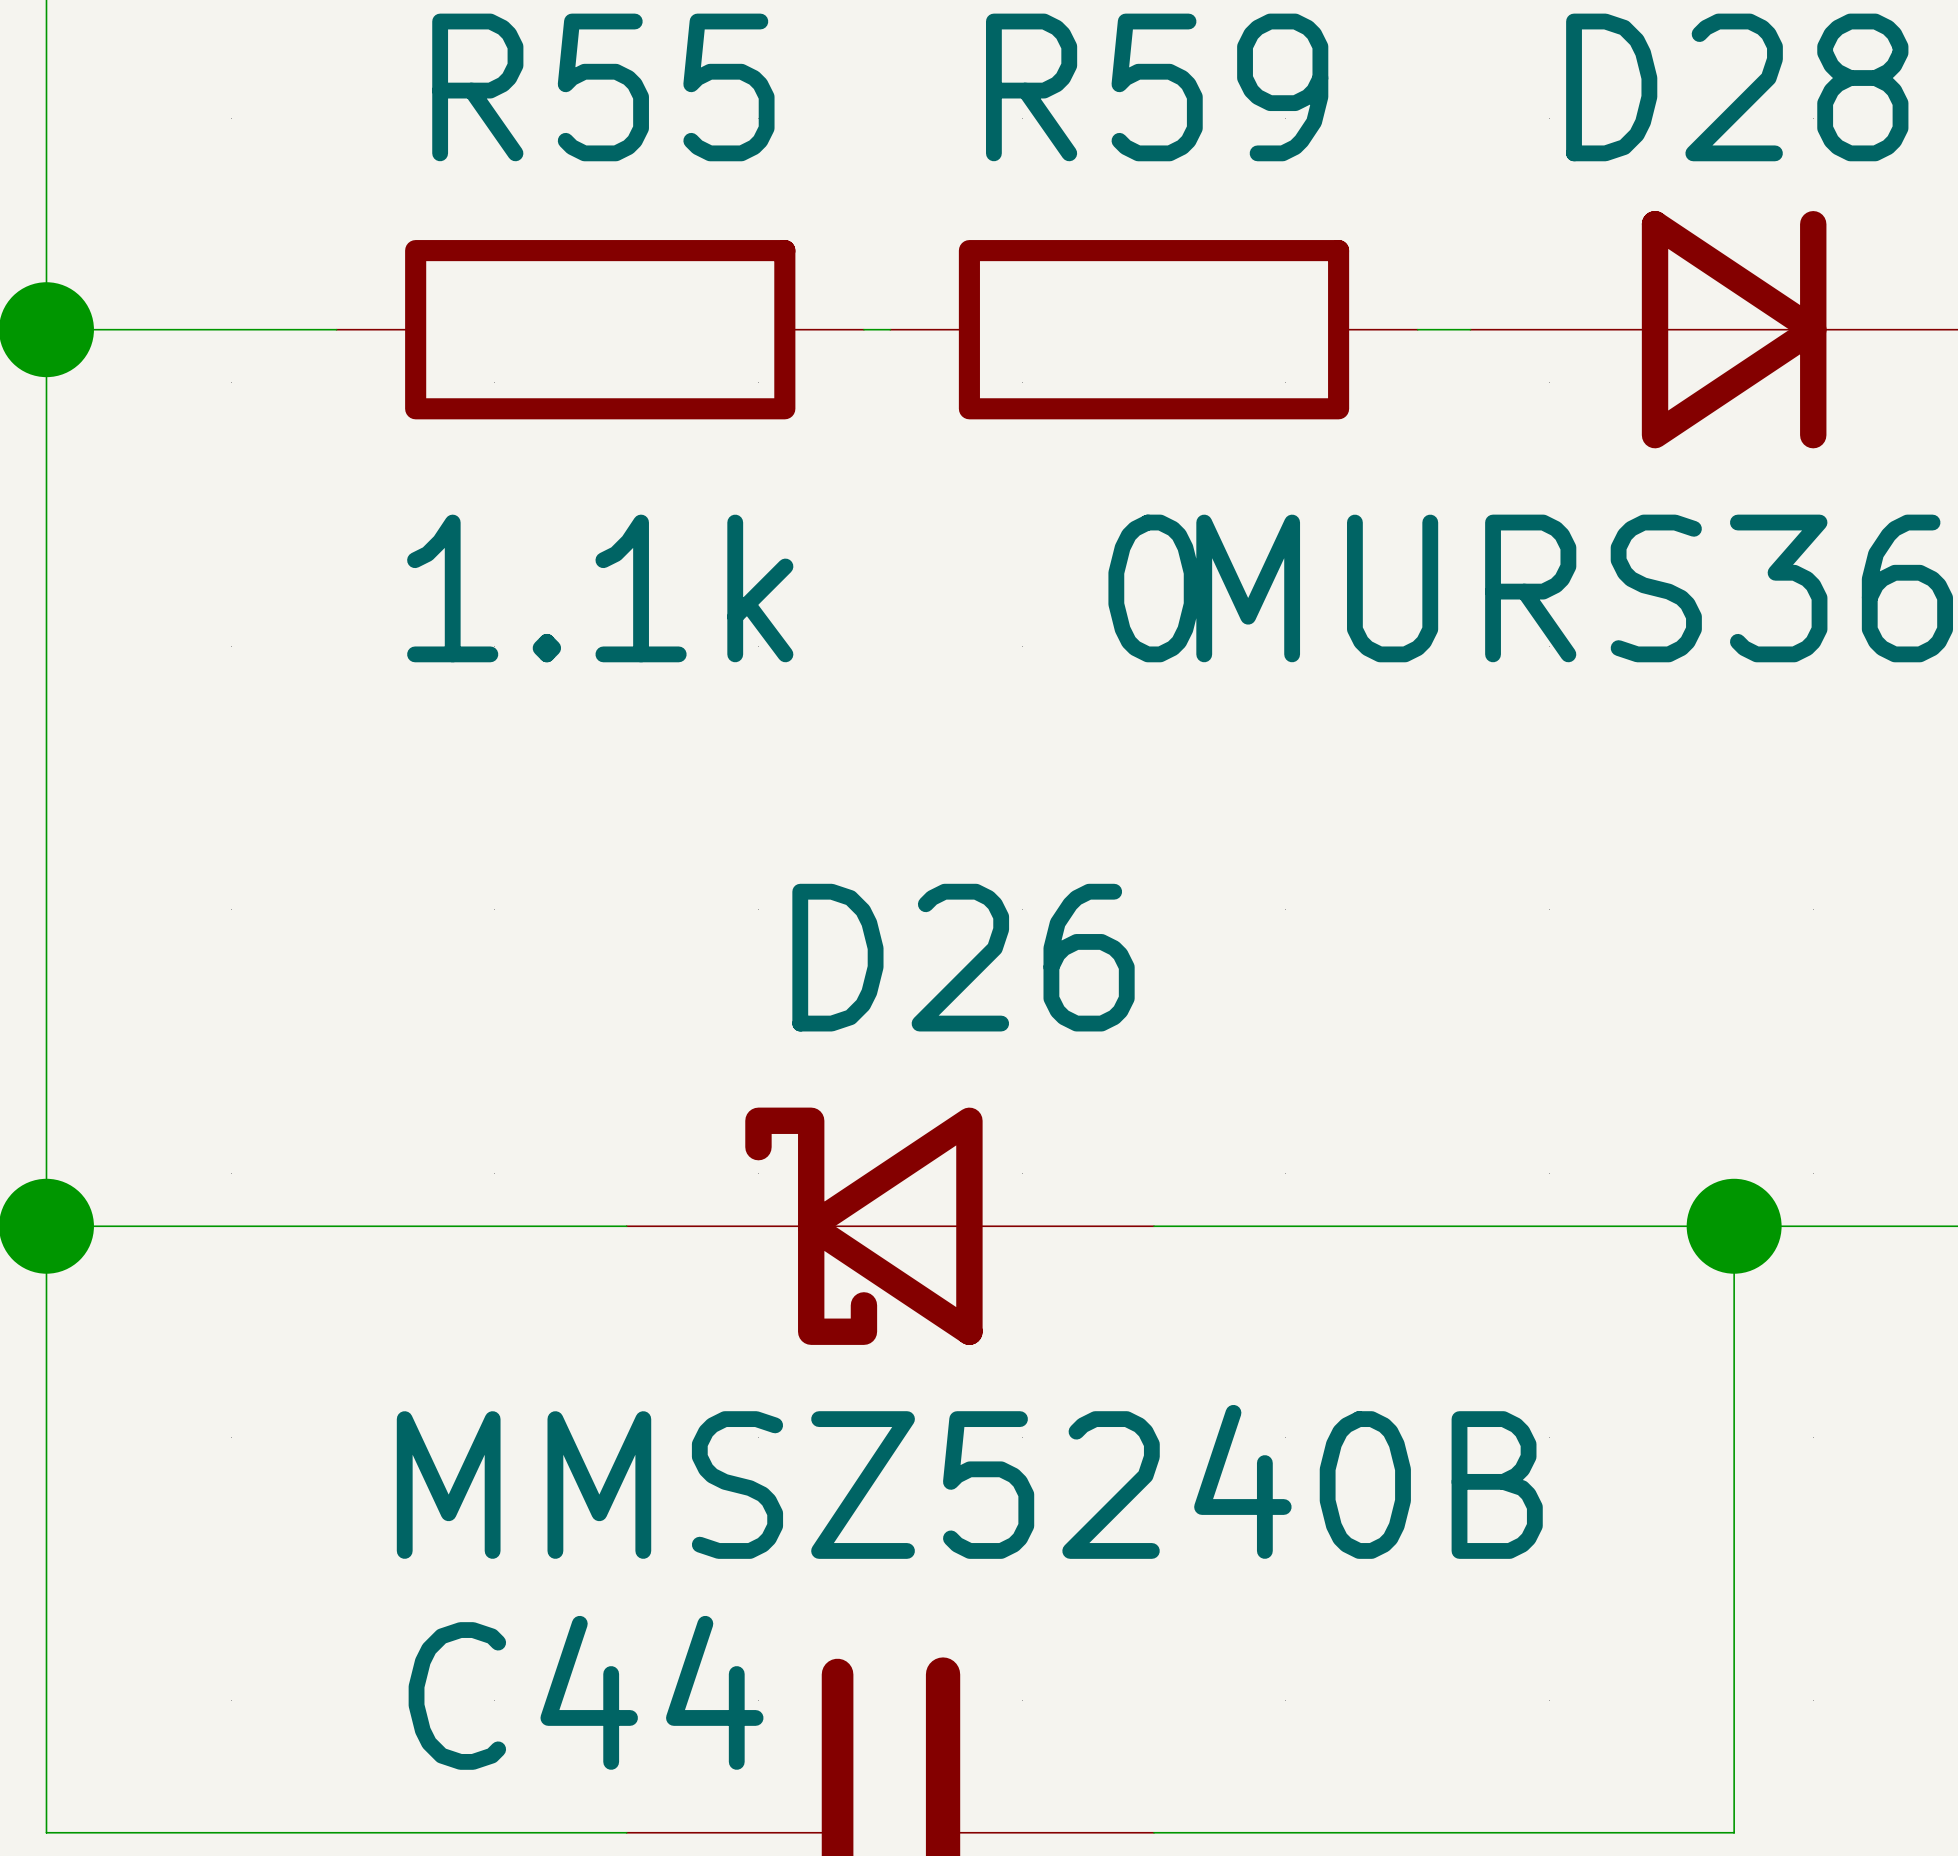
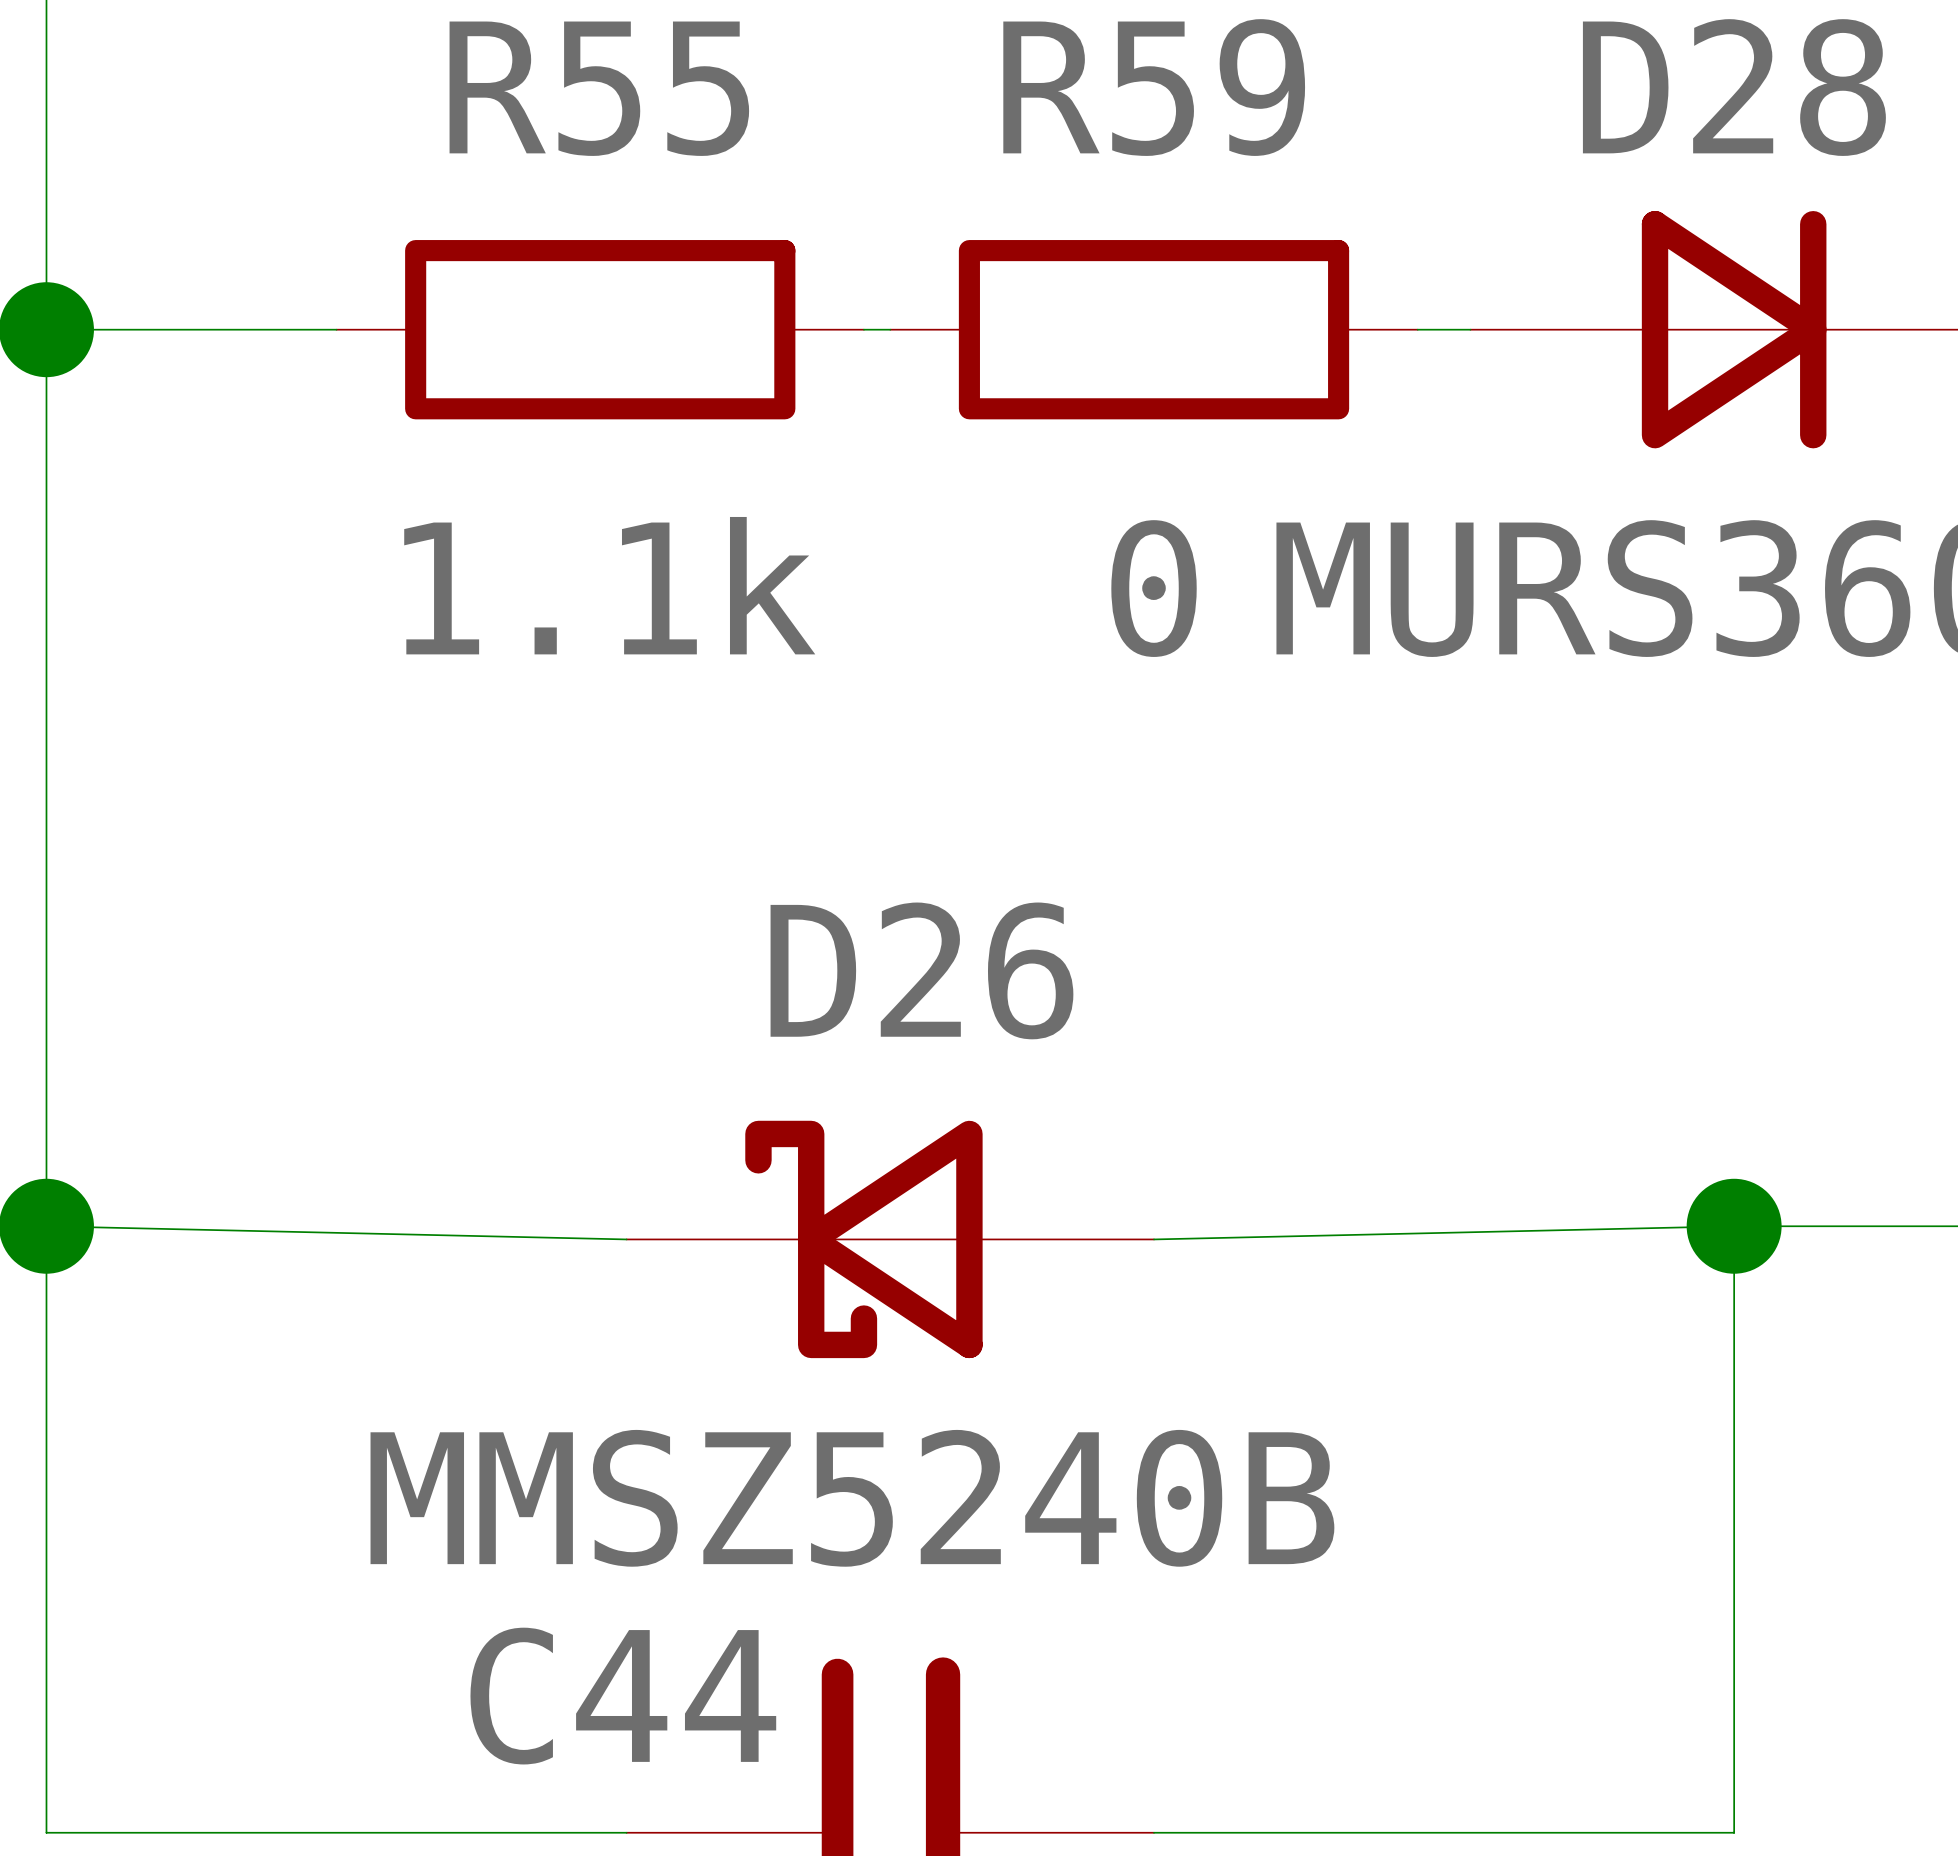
wire: (46, 1226) (626, 1226) -> (46, 1226) (626, 1239)
D26 position: (890, 1226) -> (890, 1239)
wire: (1154, 1226) (1734, 1226) -> (1154, 1239) (1734, 1226)

